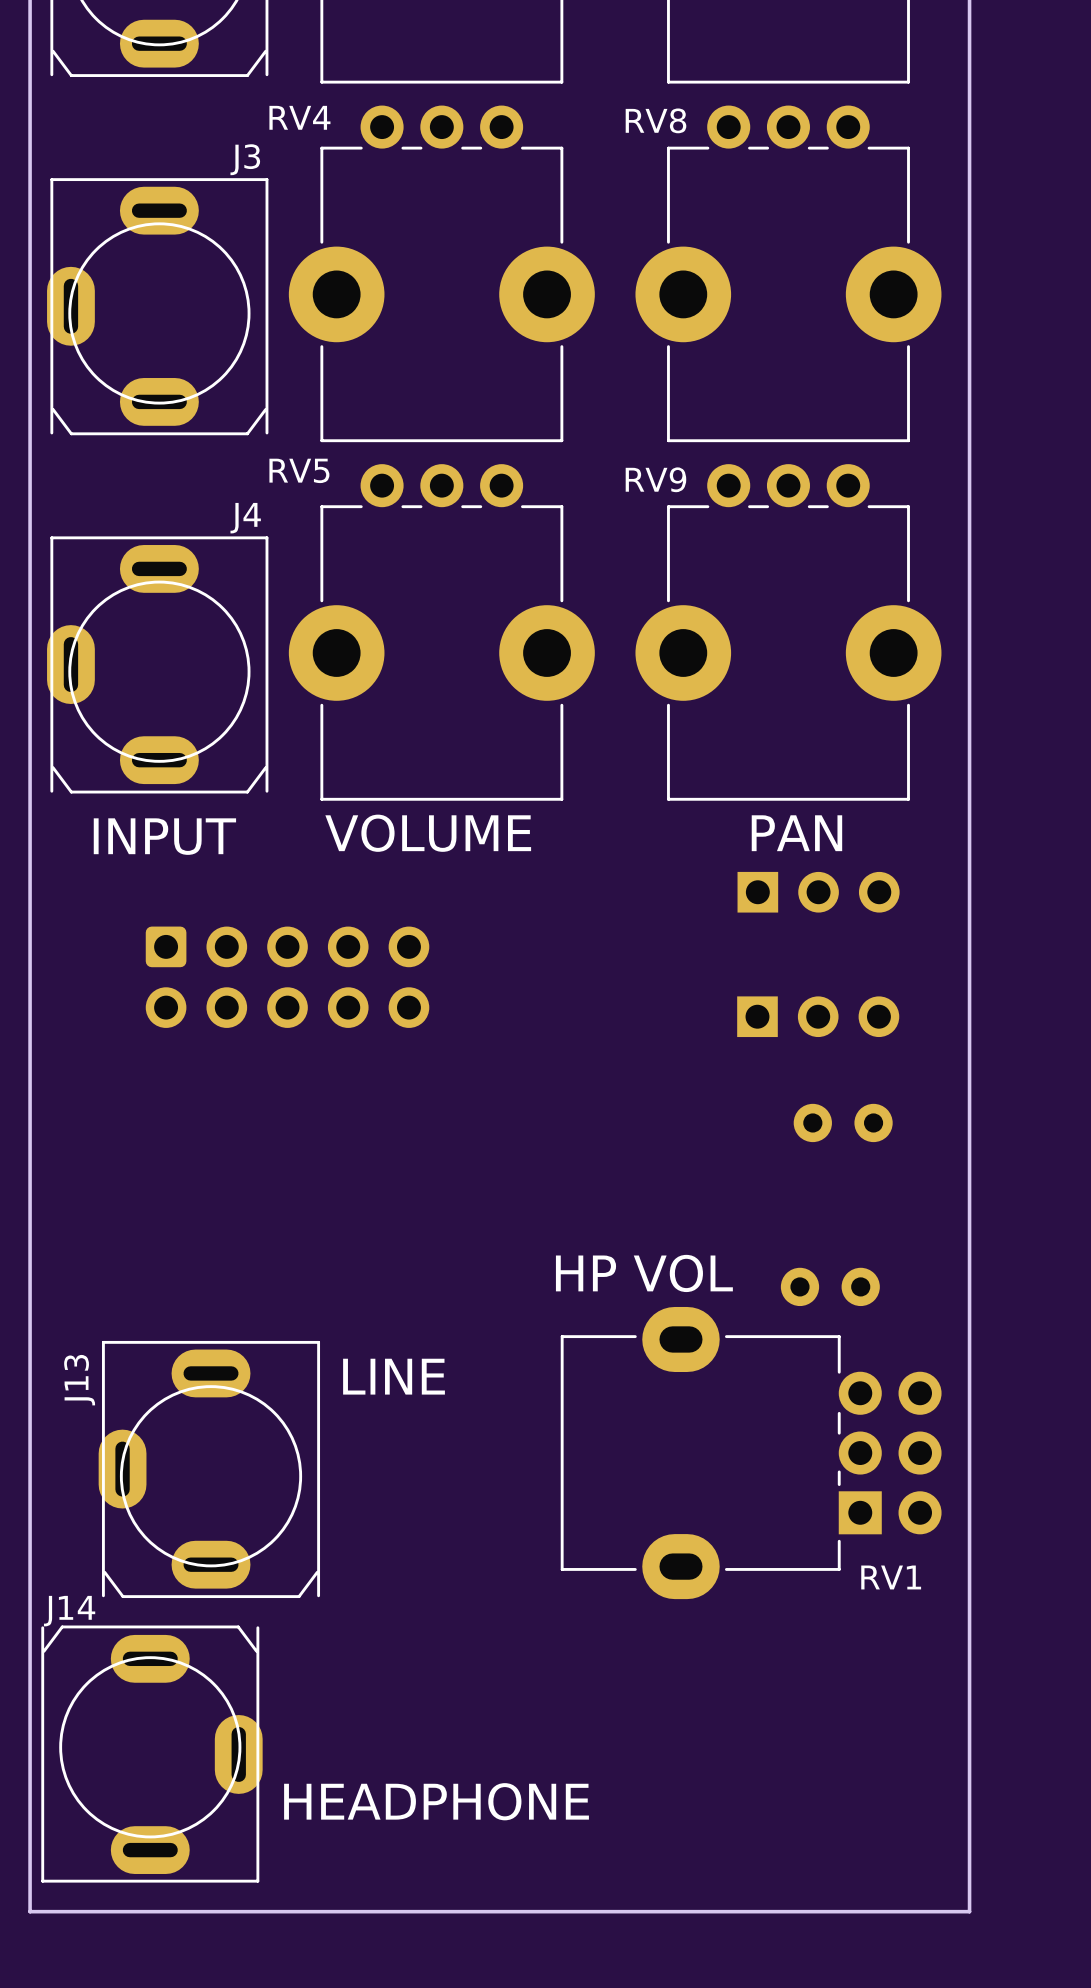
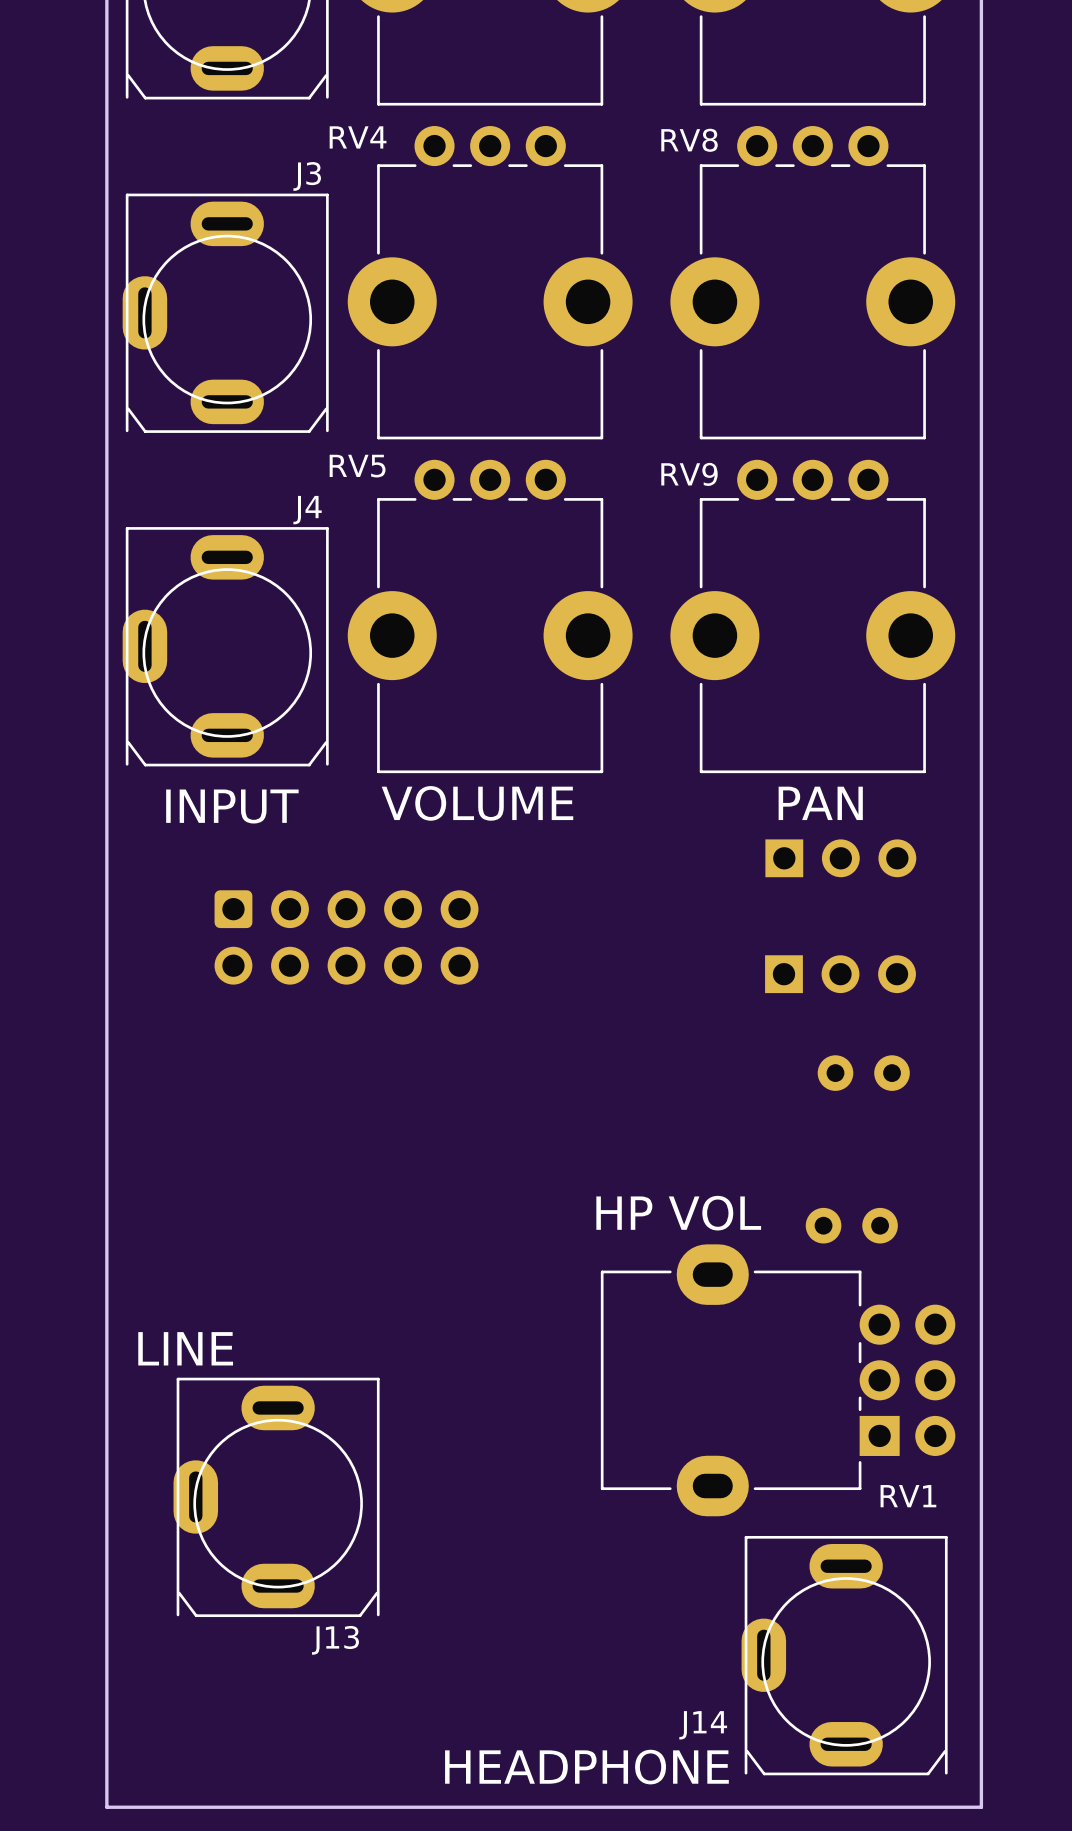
text position: LINE (394, 1376) -> LINE (185, 1348)
J13 name rotation: 0° (79, 1380) -> 90° clockwise (335, 1640)
J13 name position: J13 (79, 1380) -> J13 (335, 1640)
J13 position: (209, 1469) -> (276, 1497)
J14 name position: J14 (69, 1611) -> J14 (703, 1725)
J14 rotation: 0° (151, 1754) -> 180° (844, 1655)
J14 position: (151, 1754) -> (844, 1655)
text position: HEADPHONE (436, 1801) -> HEADPHONE (586, 1767)

